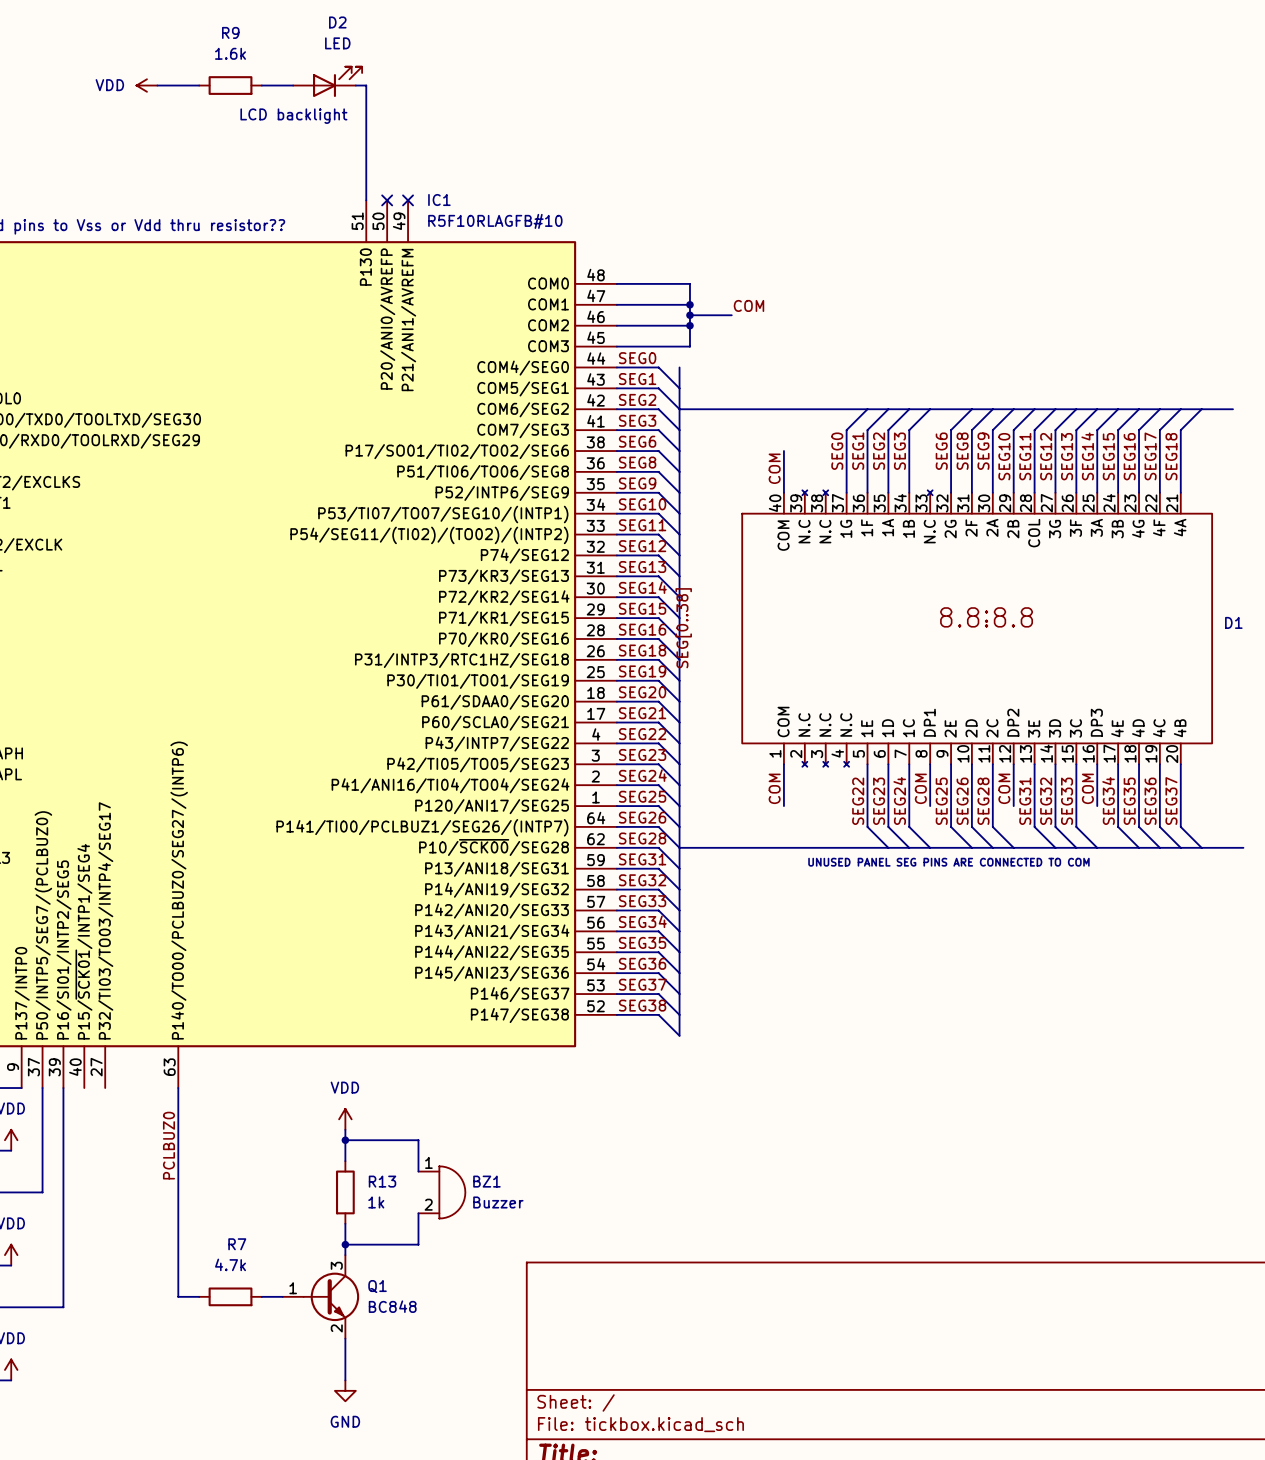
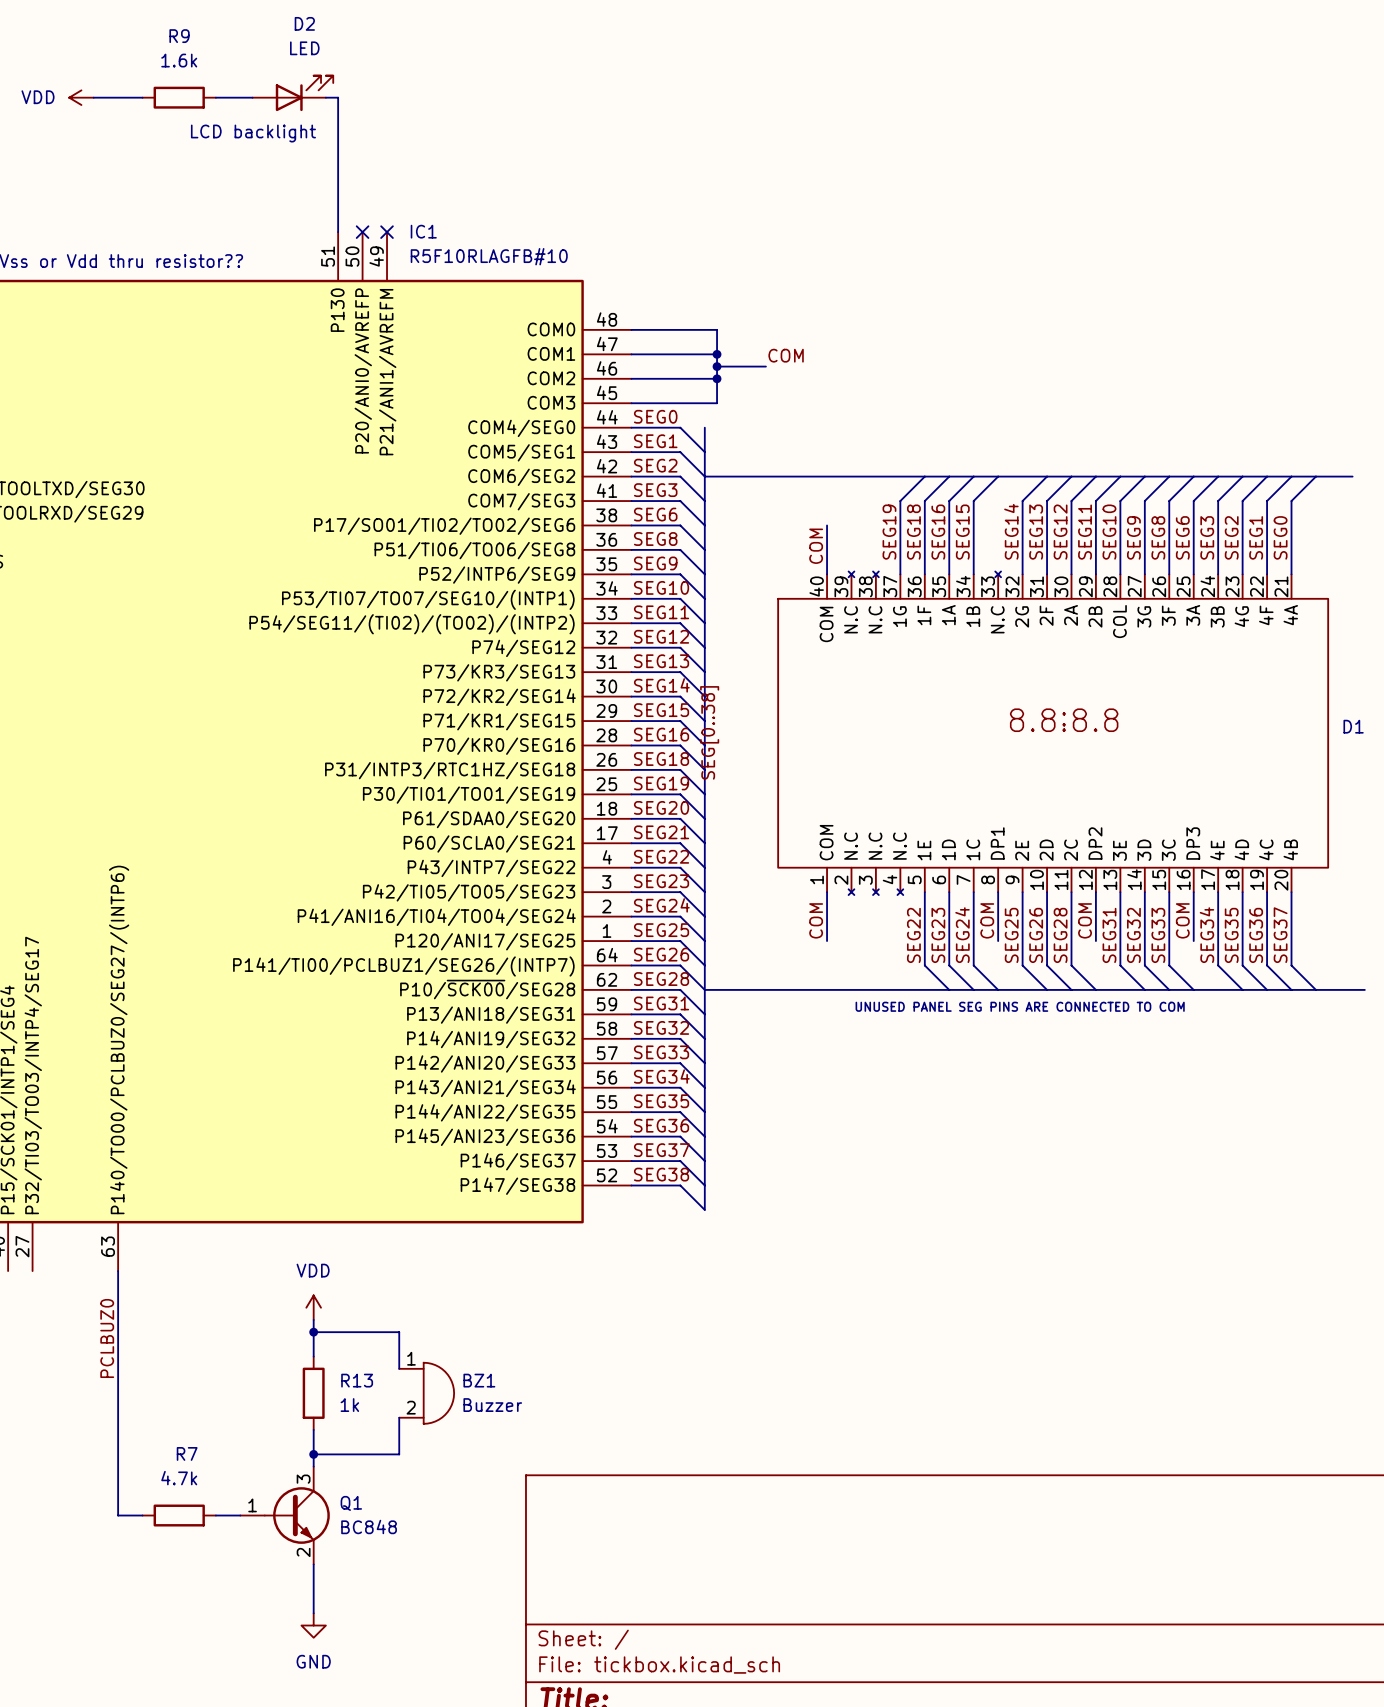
label: SEG0 (837, 451) -> SEG19 (889, 532)
label: SEG1 (858, 451) -> SEG18 (913, 532)
label: SEG2 (879, 451) -> SEG16 (938, 532)
label: SEG3 (899, 451) -> SEG15 (962, 532)
label: SEG6 (941, 451) -> SEG14 (1011, 531)
label: SEG8 (962, 451) -> SEG13 (1036, 532)
label: SEG9 (983, 451) -> SEG12 (1060, 532)
label: SEG10 (1004, 456) -> SEG11 (1085, 532)
label: SEG11 (1025, 456) -> SEG10 (1109, 532)
label: SEG12 (1046, 456) -> SEG9 (1133, 537)
label: SEG13 (1067, 456) -> SEG8 (1158, 537)
label: SEG14 (1087, 456) -> SEG6 (1182, 537)
label: SEG15 (1108, 456) -> SEG3 (1207, 537)
label: SEG16 (1129, 456) -> SEG2 (1231, 537)
label: SEG17 (1150, 456) -> SEG1 (1256, 537)
label: SEG18 (1171, 456) -> SEG0 (1280, 537)

